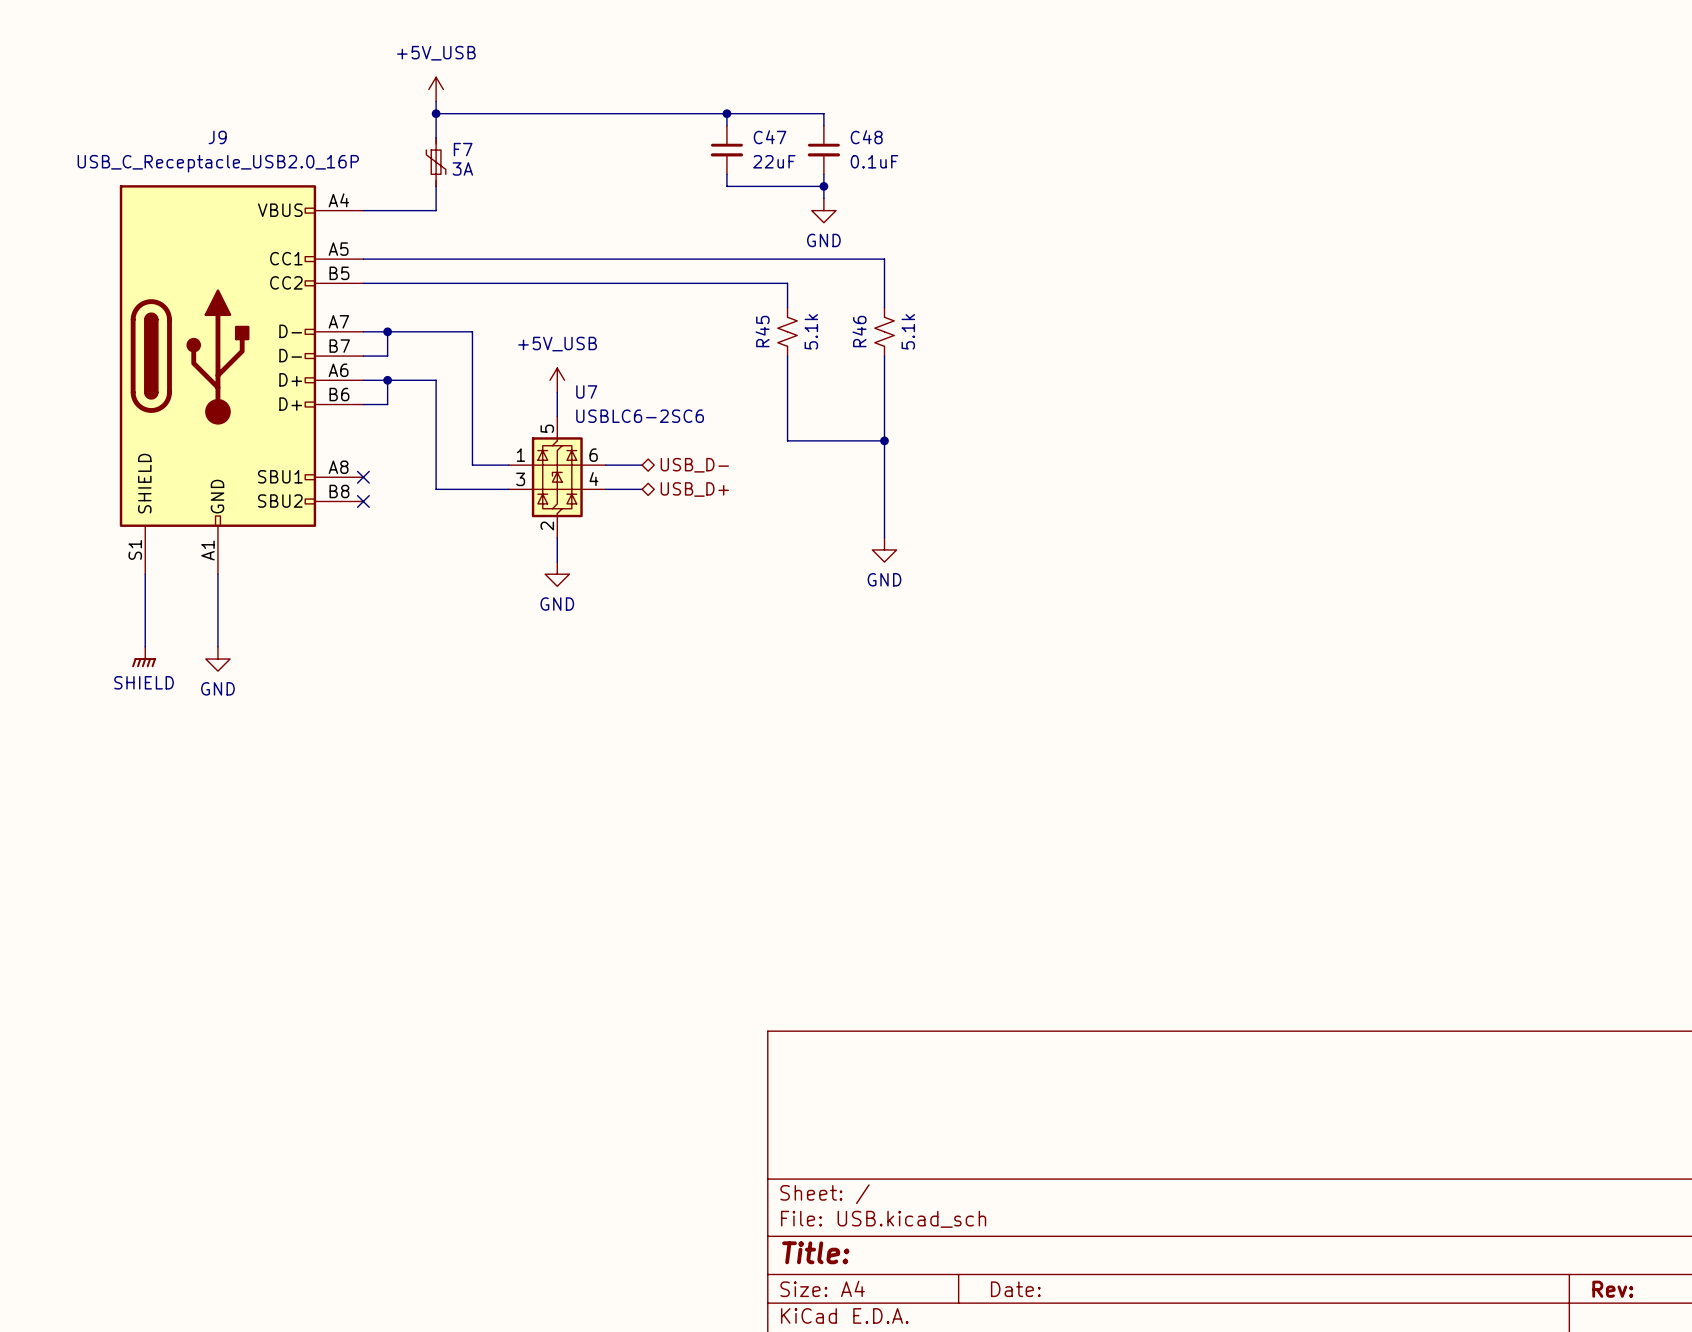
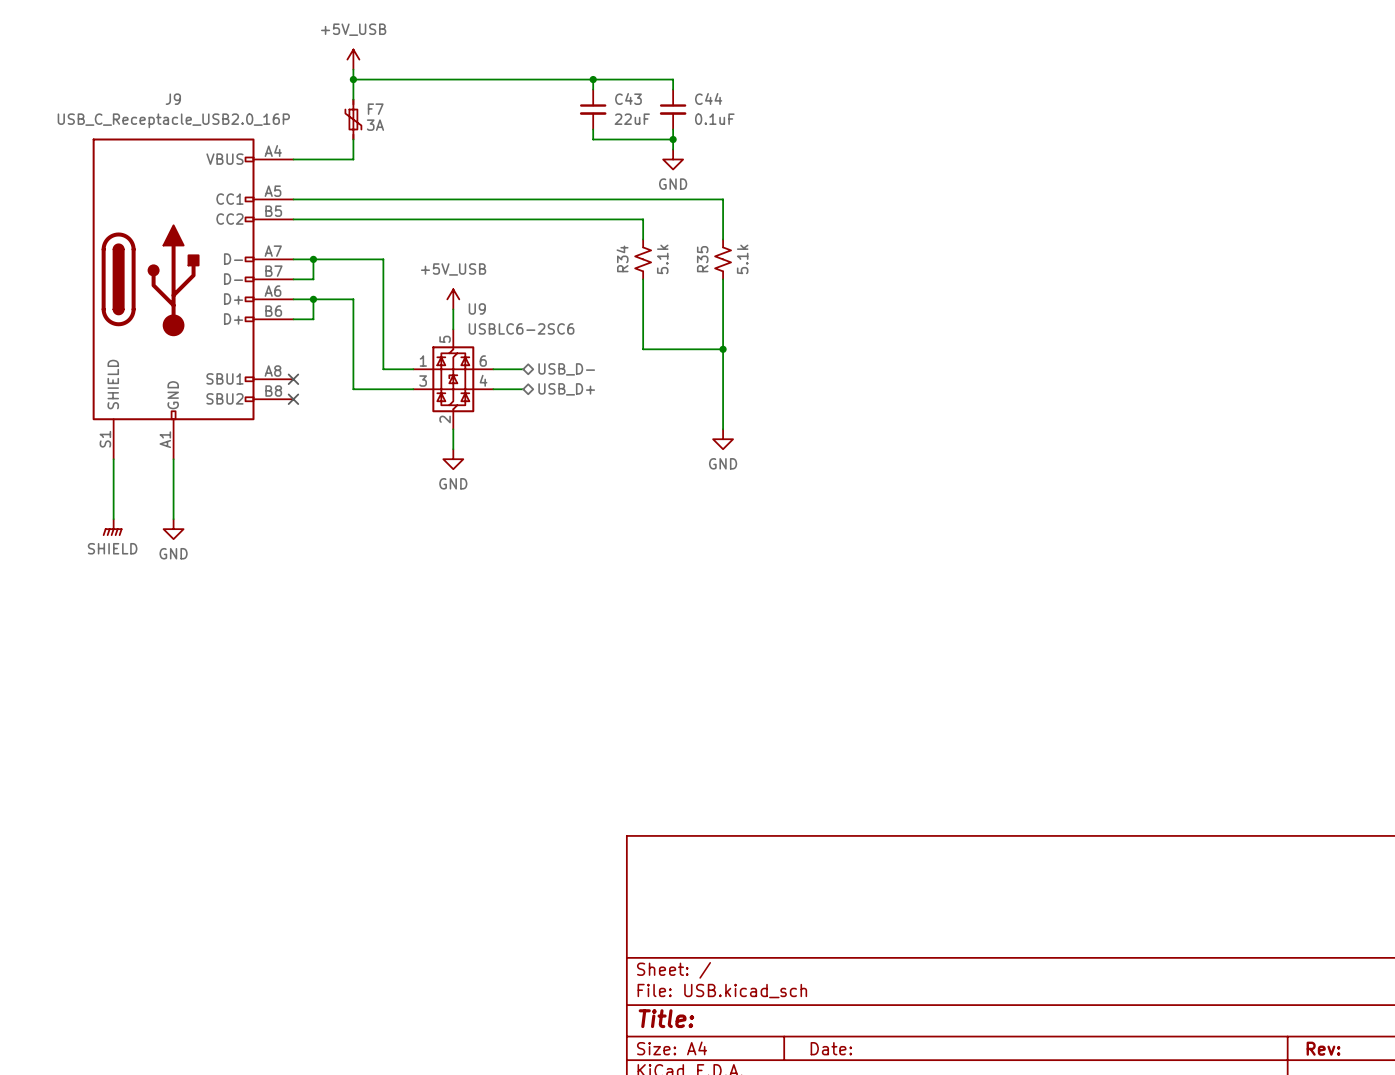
C47 name: C47 (770, 137) -> C43 (628, 98)
C48 name: C48 (866, 137) -> C44 (708, 98)
R45 name: R45 (762, 331) -> R34 (622, 258)
R46 name: R46 (859, 331) -> R35 (702, 259)
U7 name: U7 (586, 391) -> U9 (477, 308)

